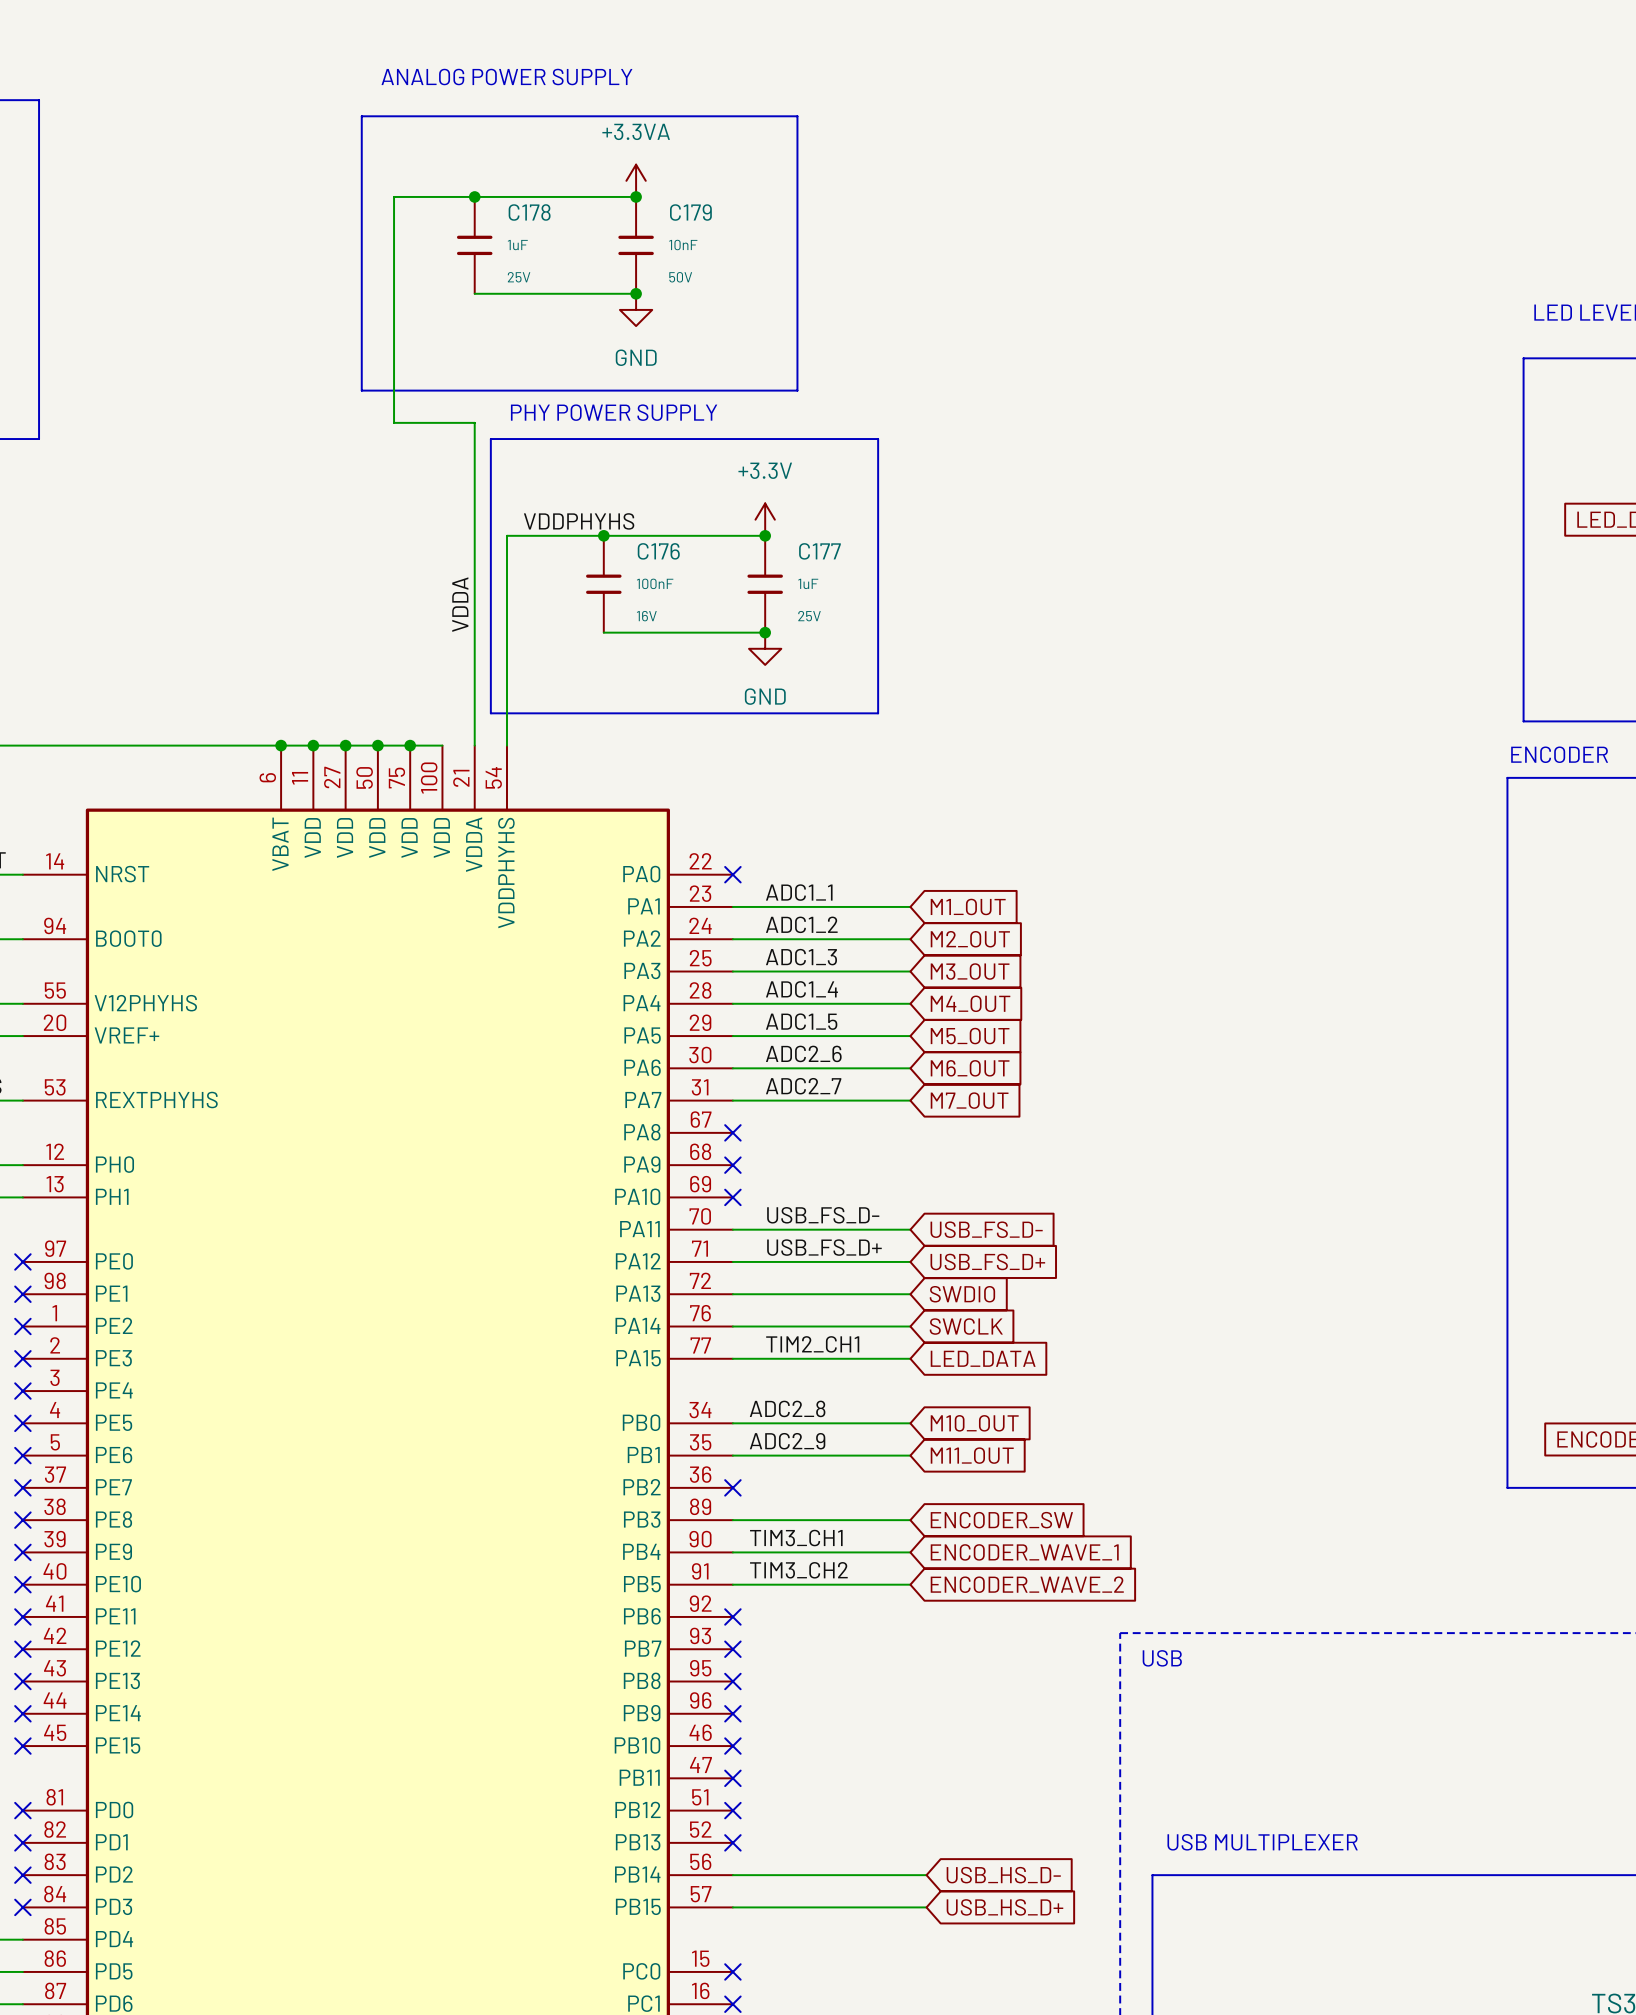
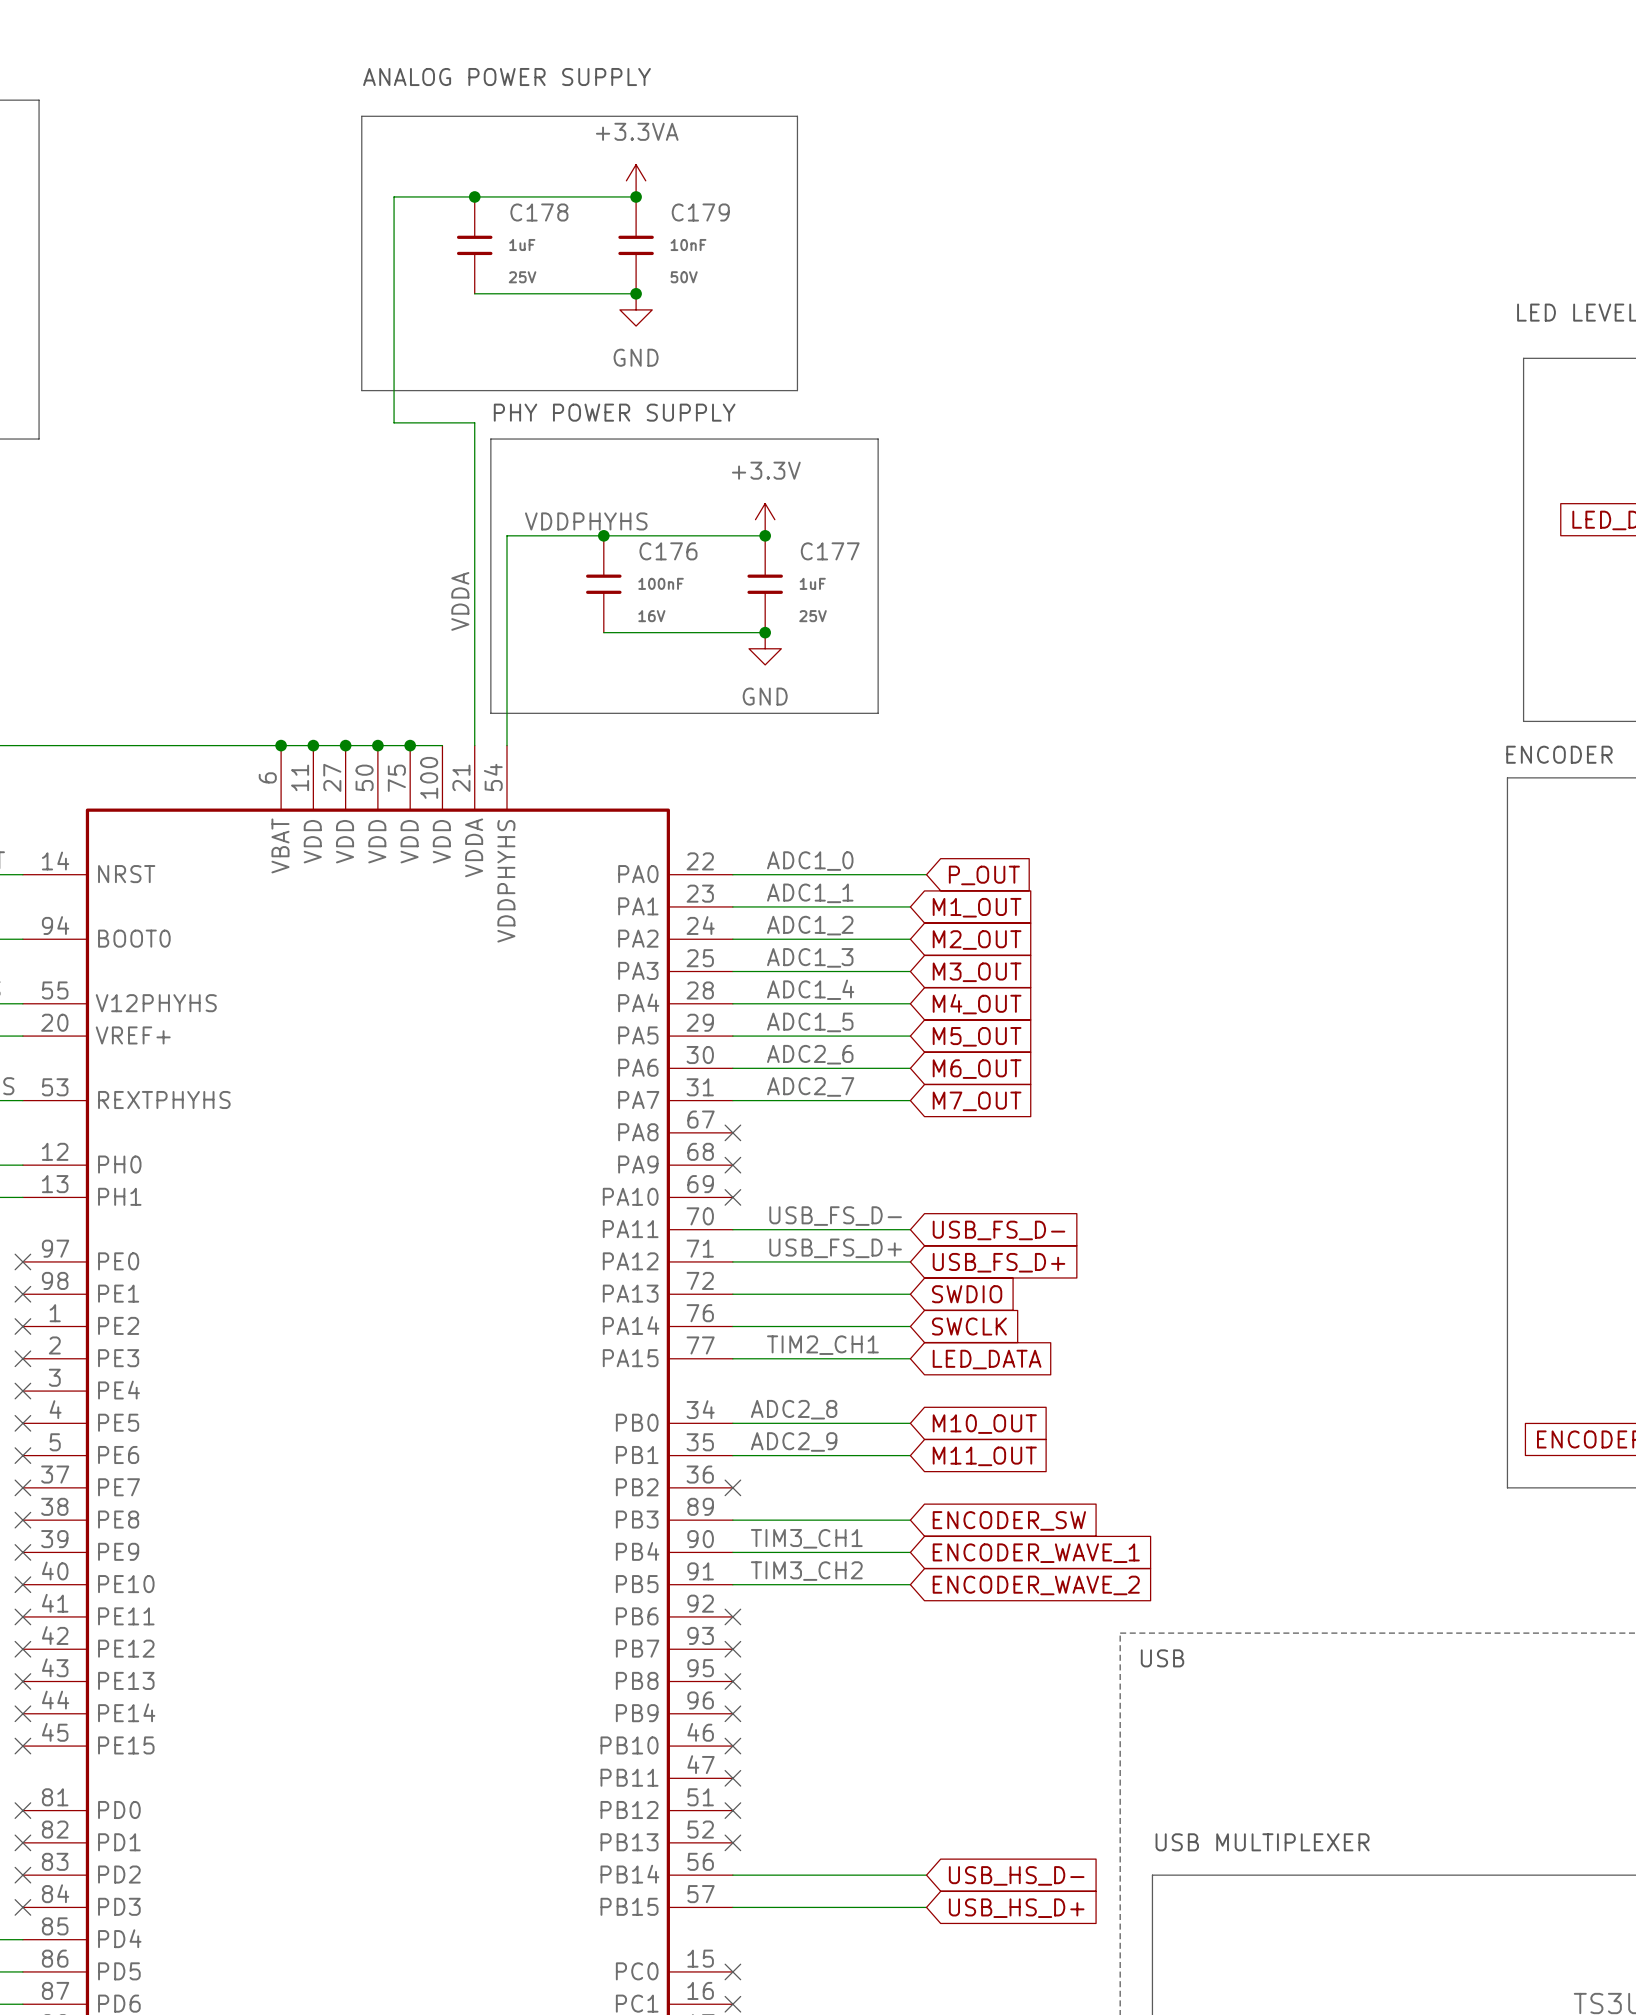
label: none -> ADC1_0 (810, 861)
wire: none -> (732, 874) (926, 874)
no-connect mark: (732, 874) -> none
global label: none -> P_OUT (984, 875)

